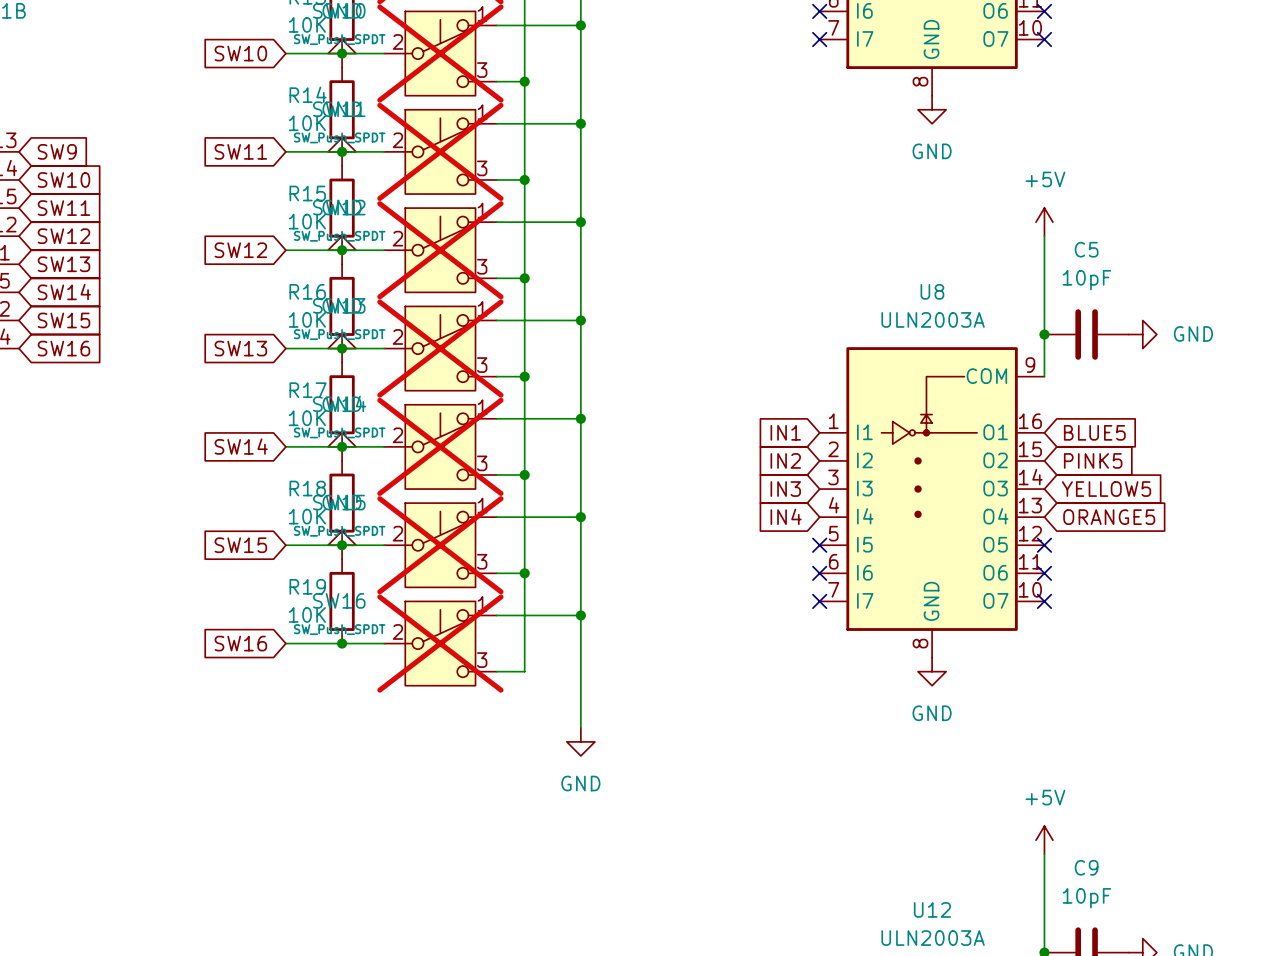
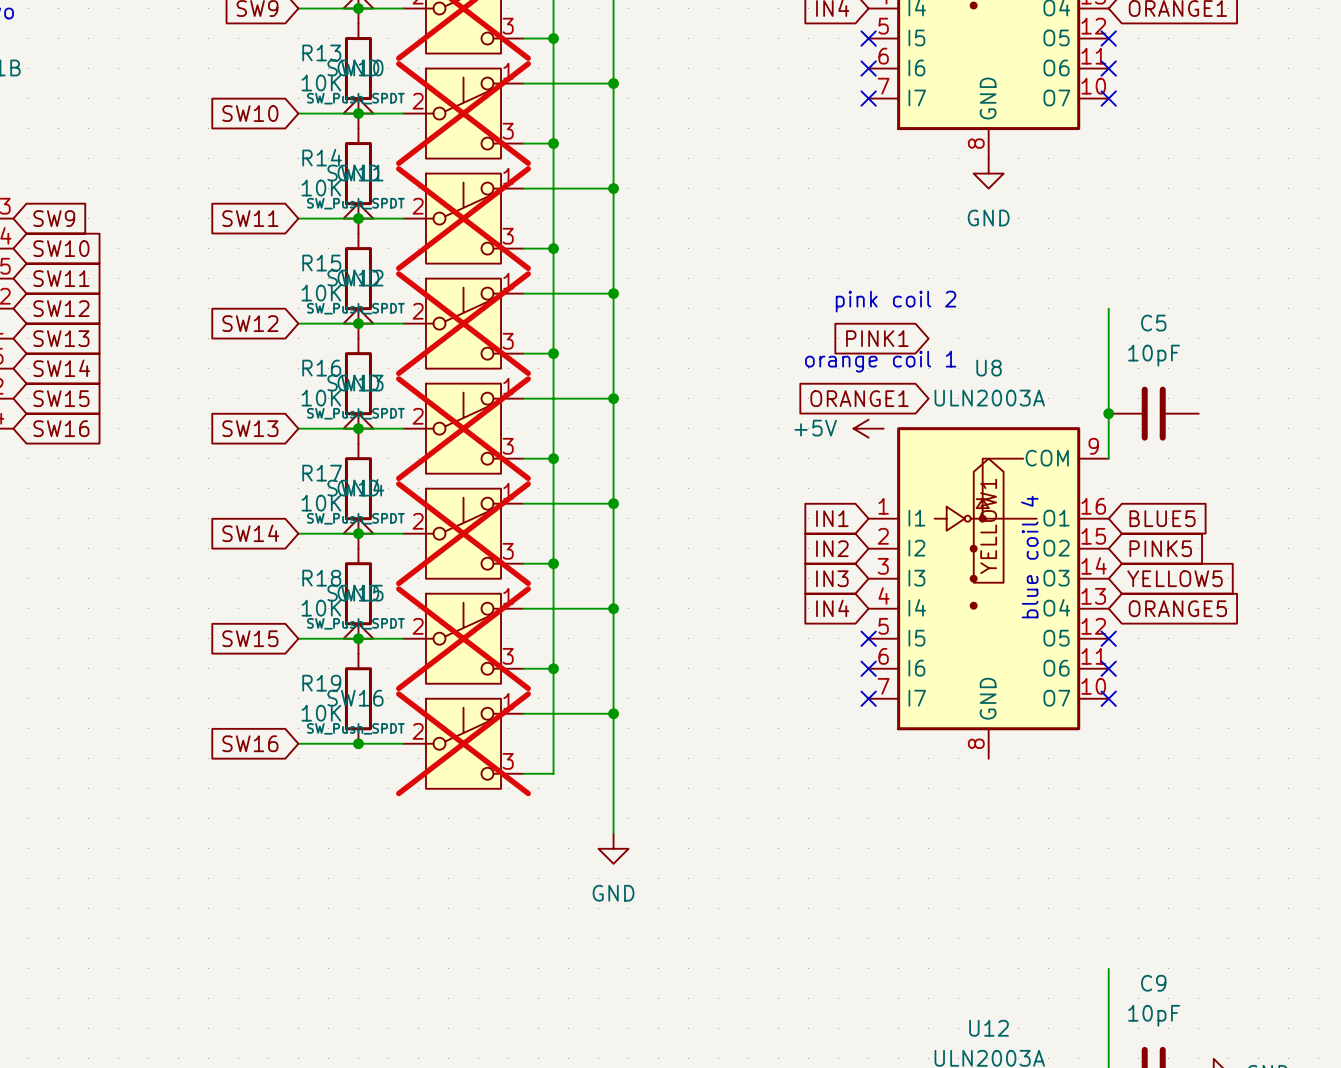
power symbol: +5V (1044, 222) -> none
text: none -> pink coil 2 (896, 301)
global label: none -> PINK1 (877, 338)
text: none -> orange coil 1 (880, 361)
global label: none -> ORANGE1 (859, 398)
power symbol: GND (1142, 334) -> none
power symbol: none -> +5V (868, 428)
global label: none -> YELLOW1 (988, 526)
text: none -> blue coil 4 (1029, 557)
power symbol: GND (932, 671) -> none
power symbol: +5V (1044, 840) -> none

